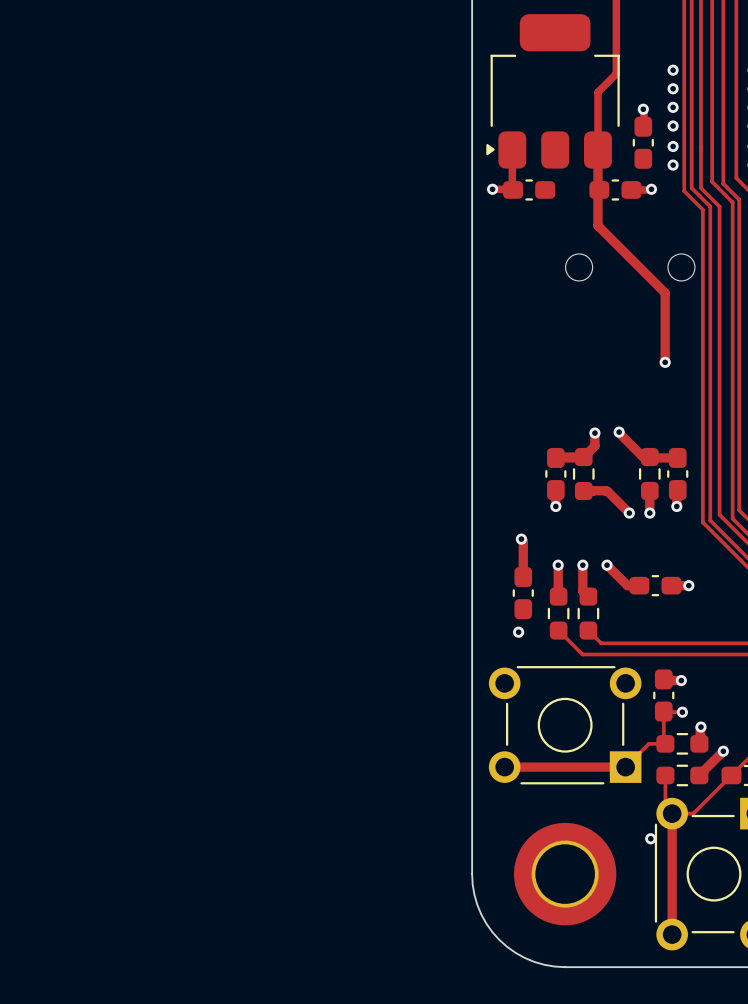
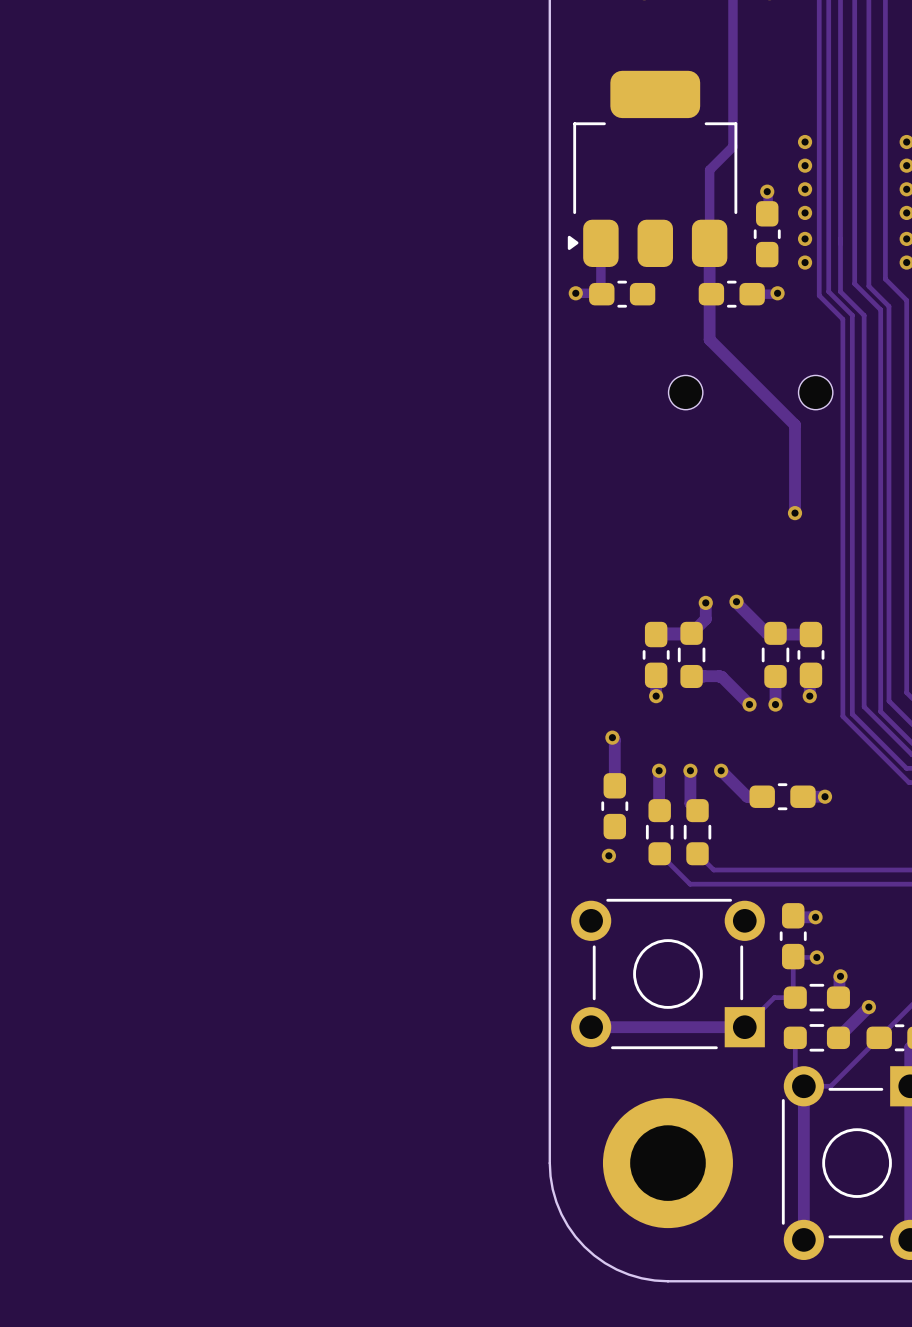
via: (650, 838) -> none

